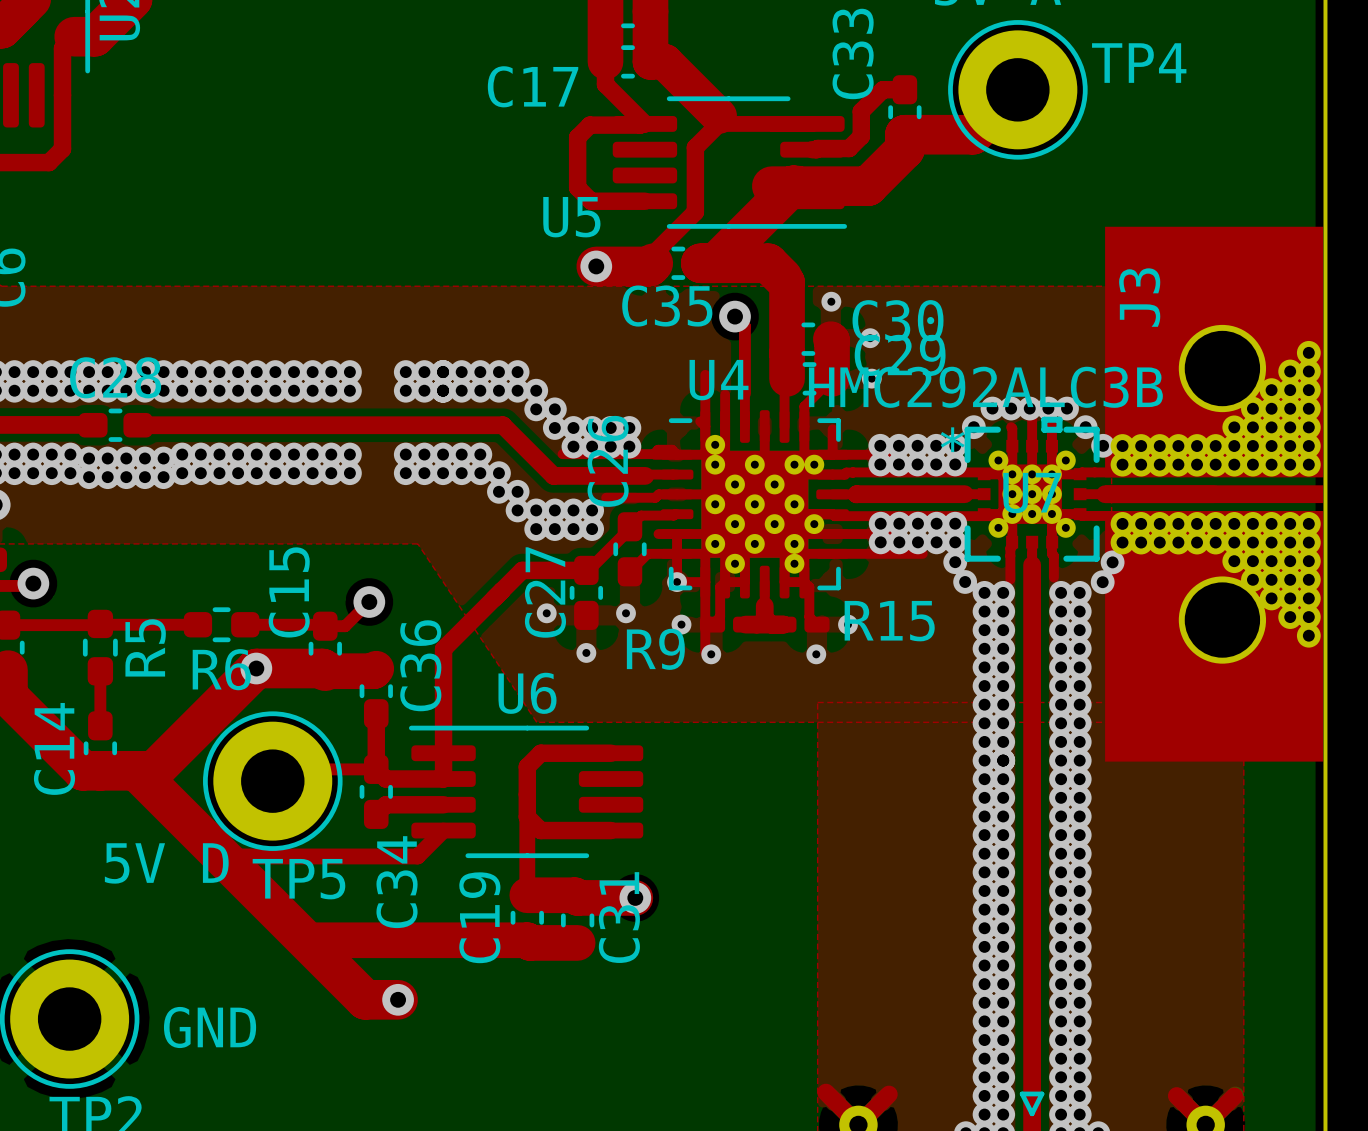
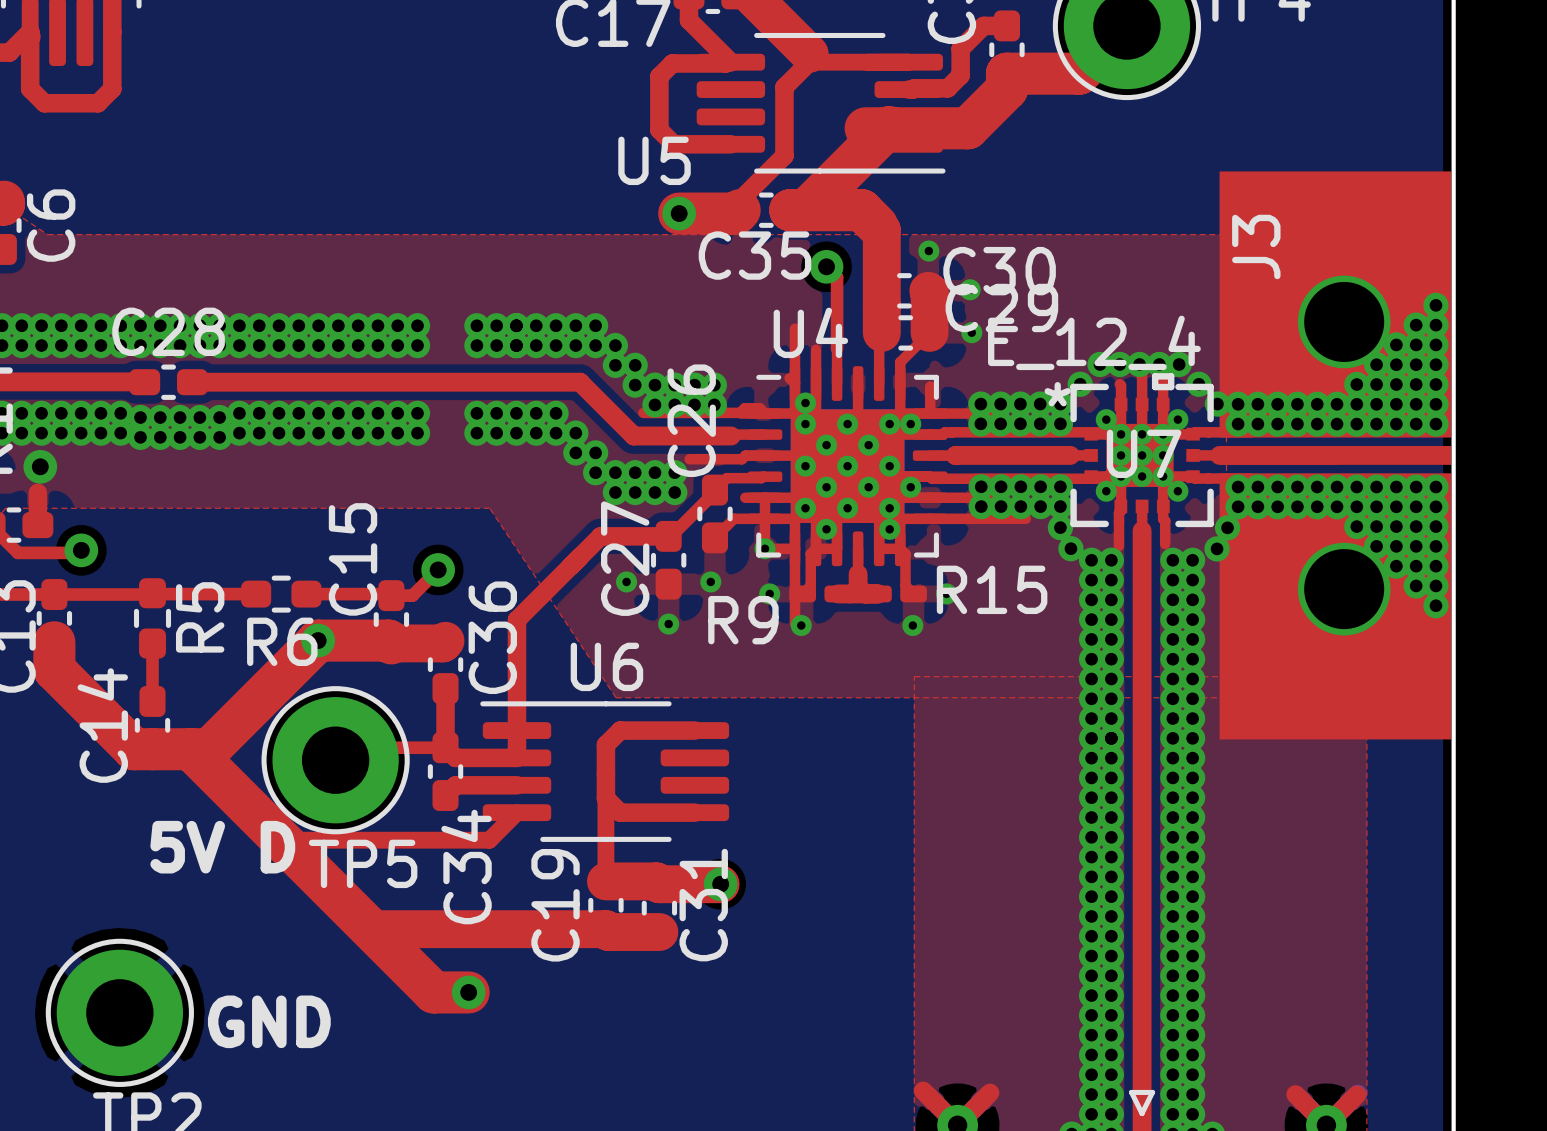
U7 value: HMC292ALC3B (985, 387) -> E_12_4 (1094, 342)

